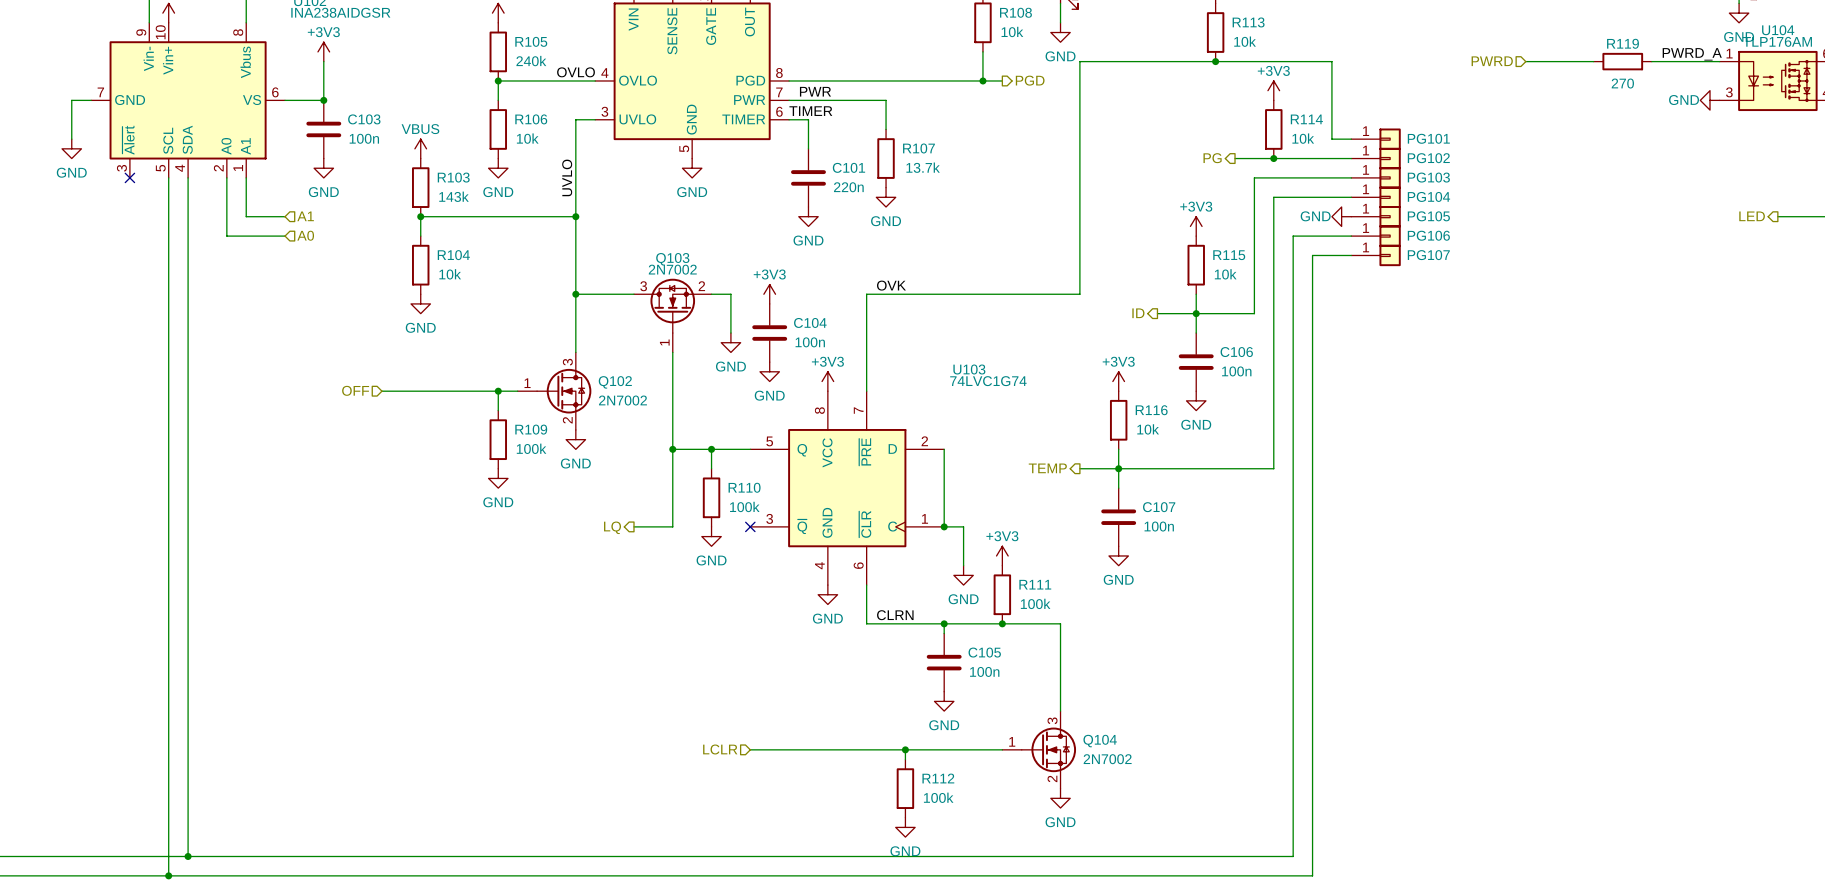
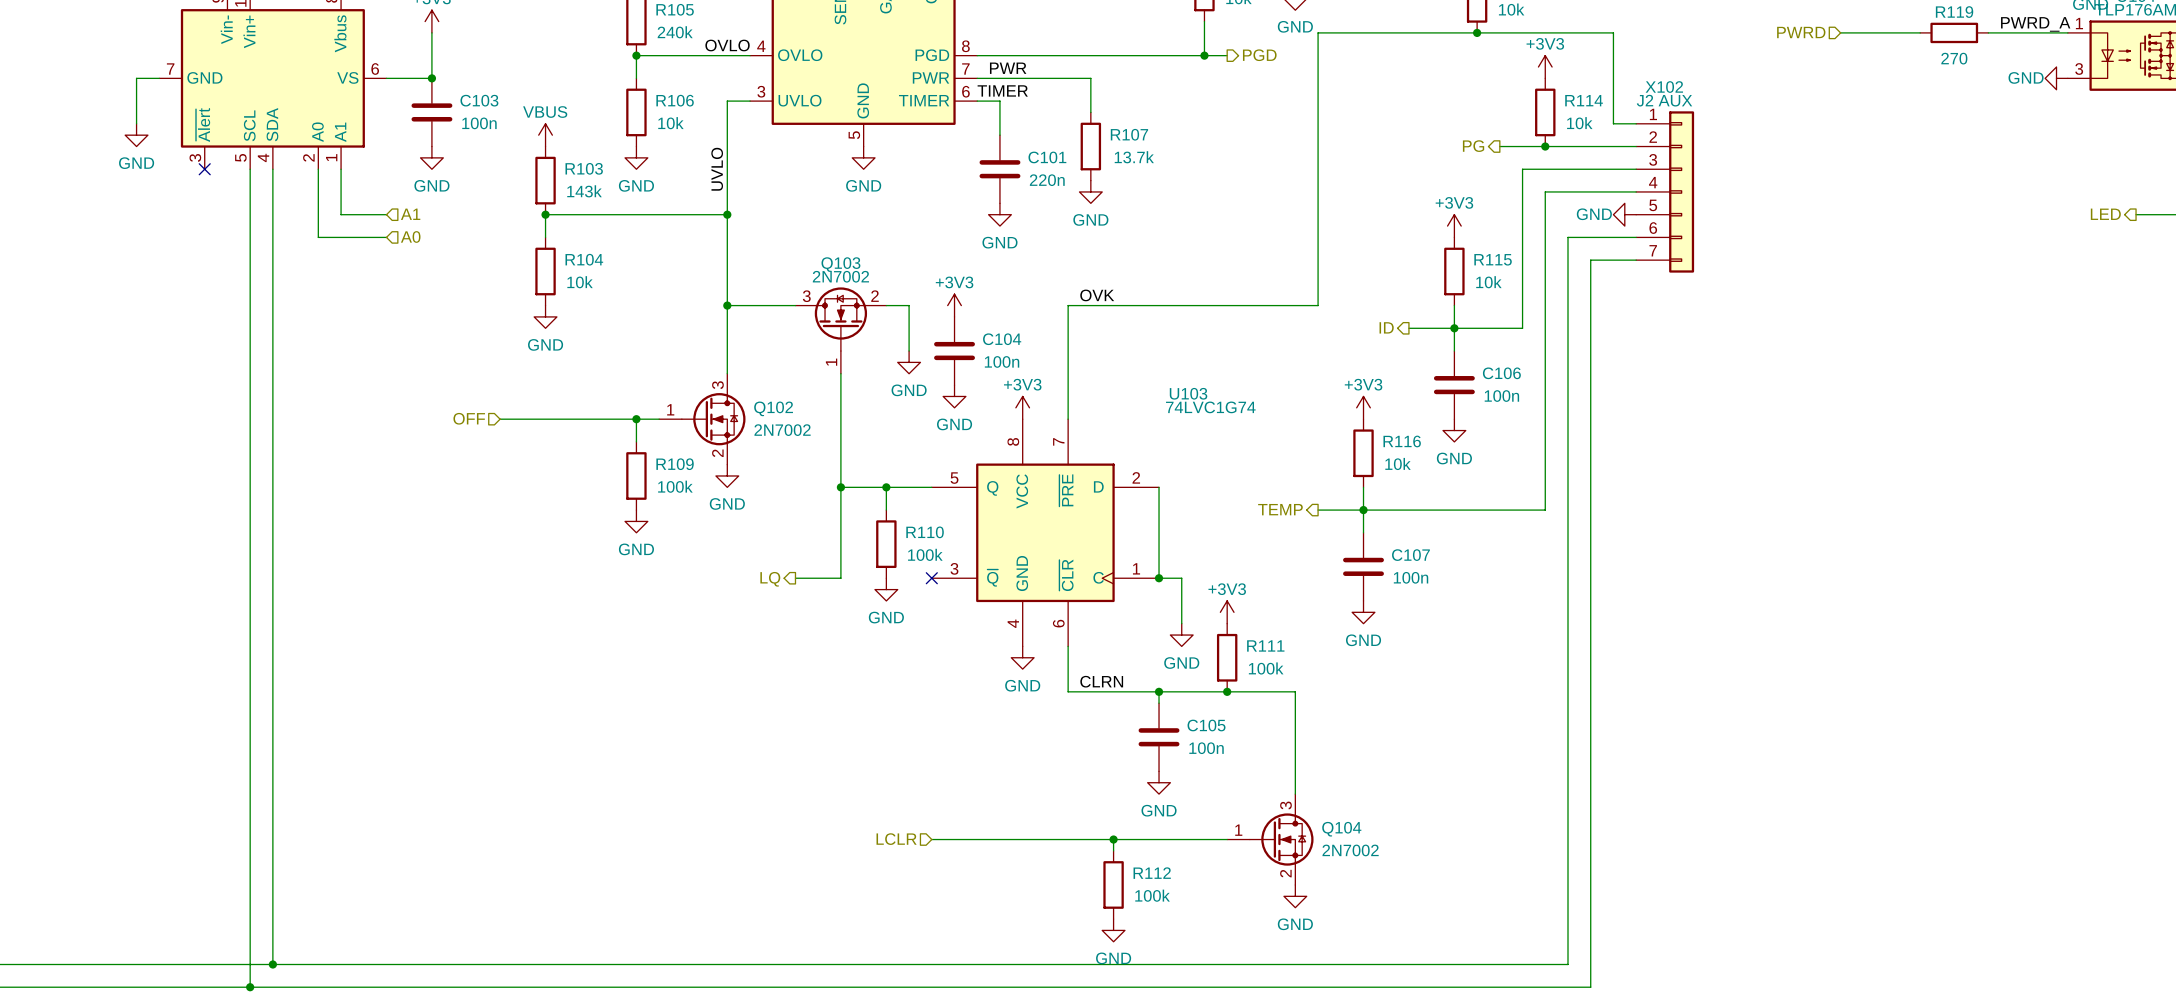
PG101: (1376, 139) -> none
PG102: (1376, 158) -> none
PG103: (1376, 177) -> none
PG104: (1376, 197) -> none
X102: none -> J2 AUX (1665, 191)
PG105: (1376, 216) -> none
PG106: (1376, 236) -> none
PG107: (1376, 255) -> none

